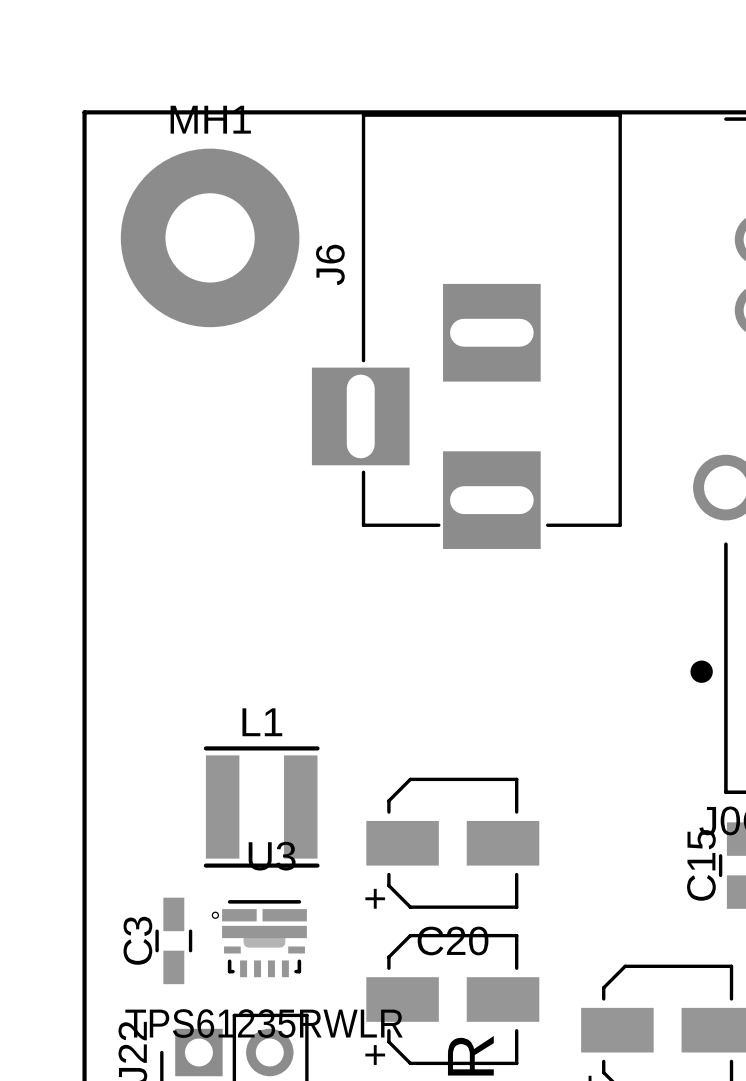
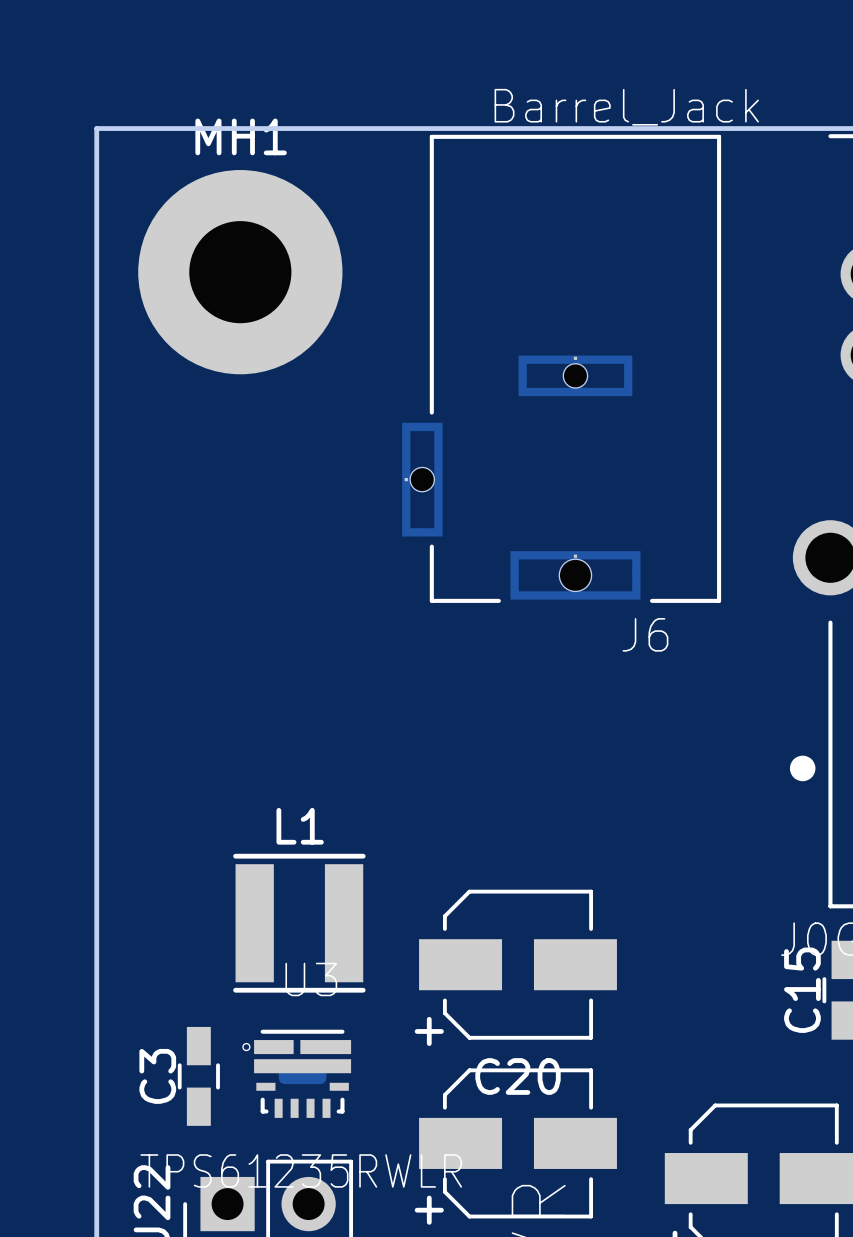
J6 value: none -> Barrel_Jack (626, 107)
J6 footprint: [311, 113, 622, 549] -> [401, 134, 722, 603]
J6 name position: J6 (330, 264) -> J6 (645, 634)

